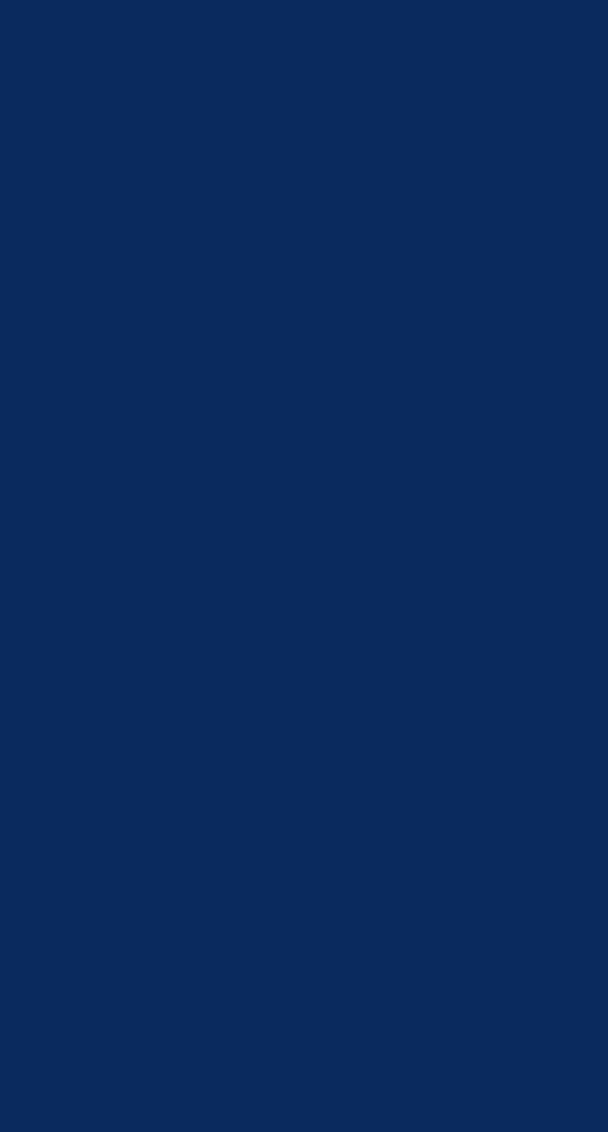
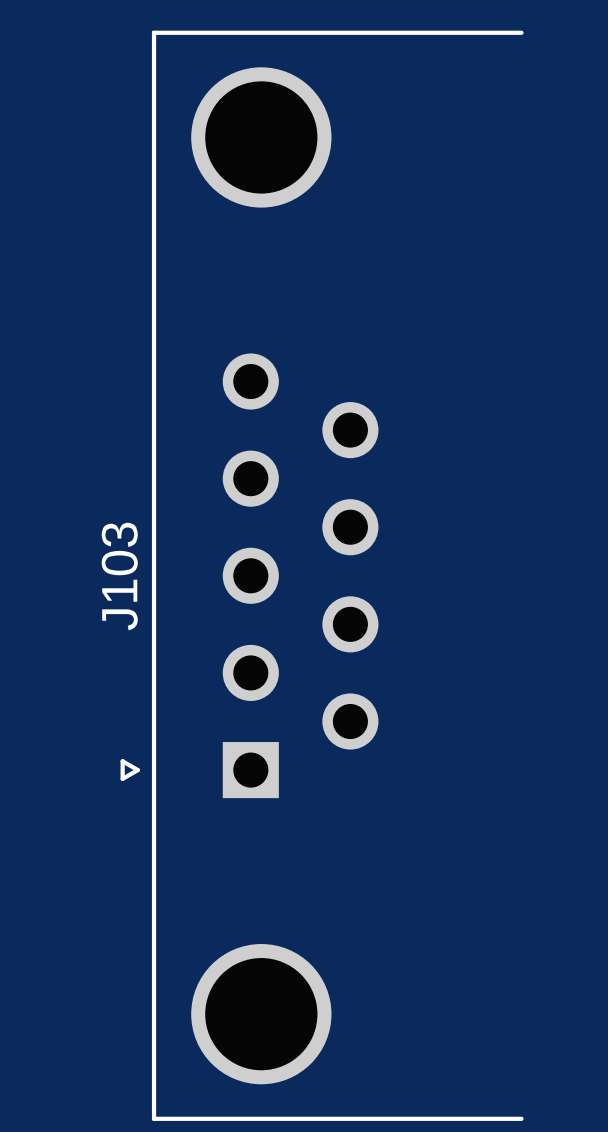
J103: none -> (322, 575)

